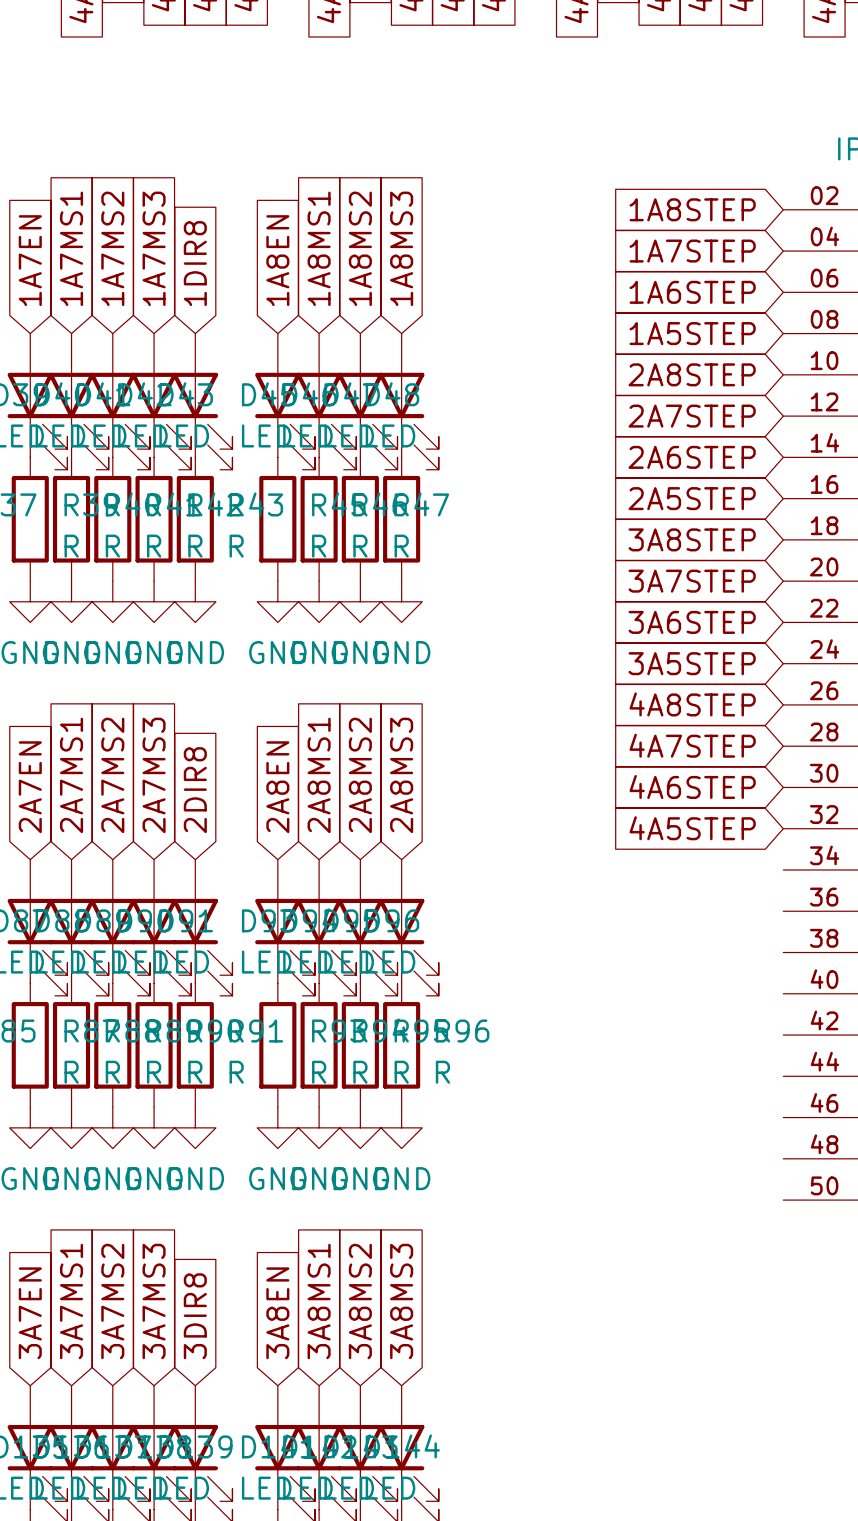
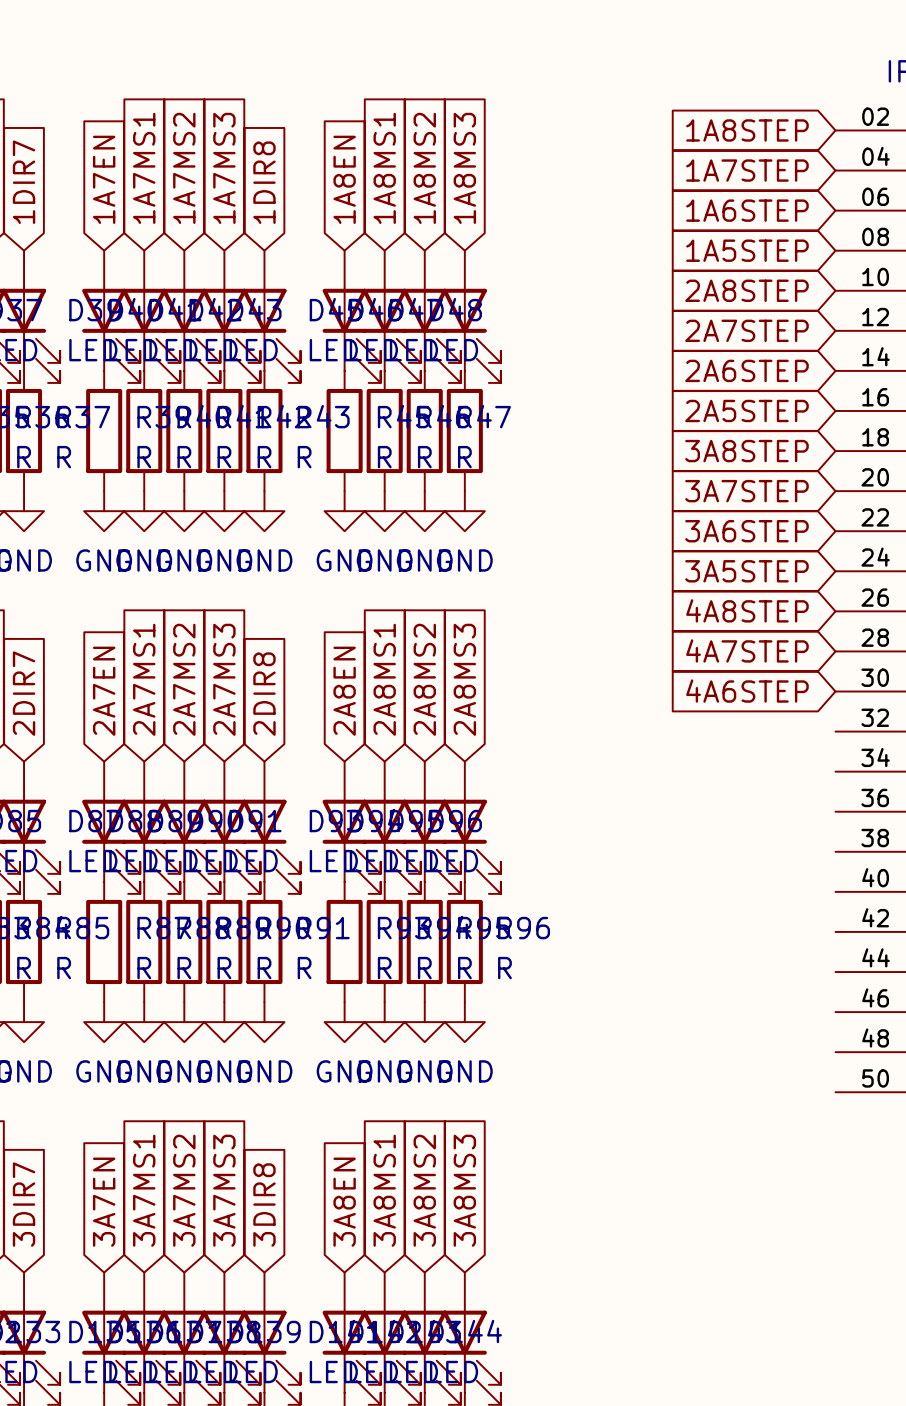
global label: 4A5STEP (692, 828) -> none

